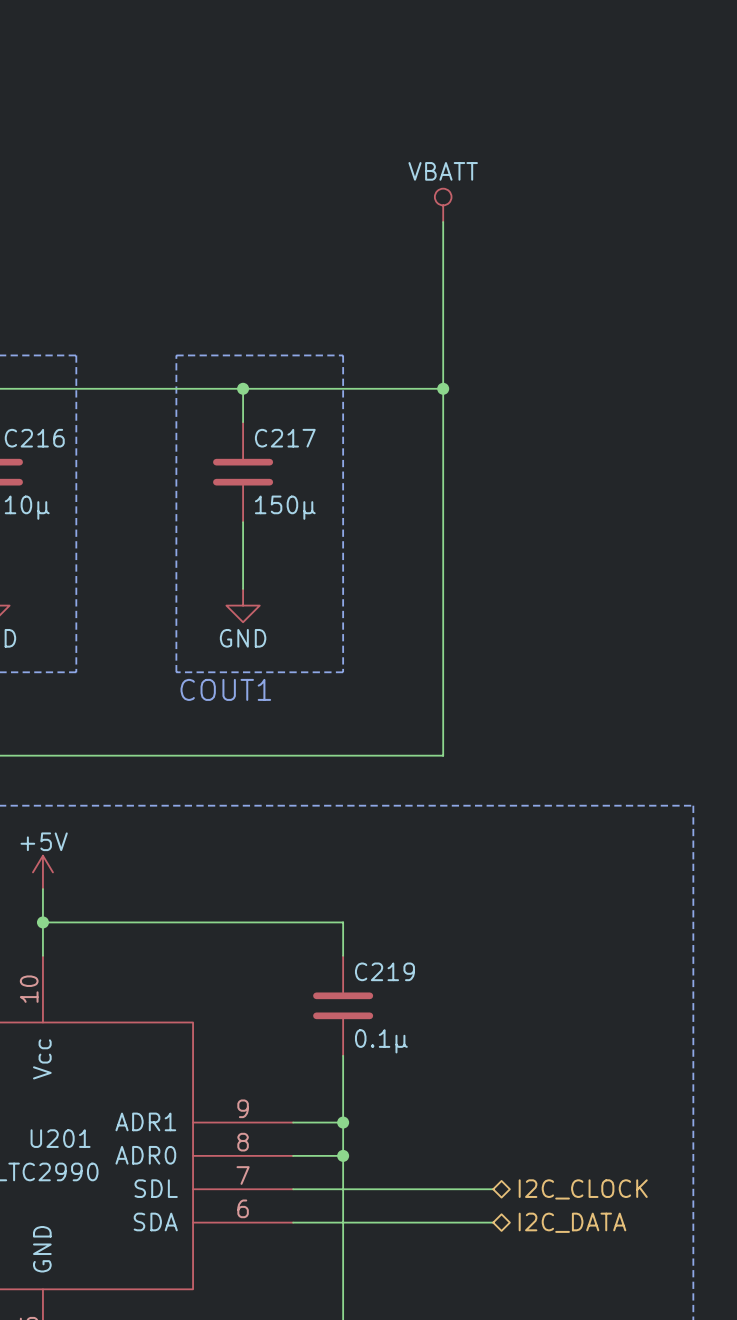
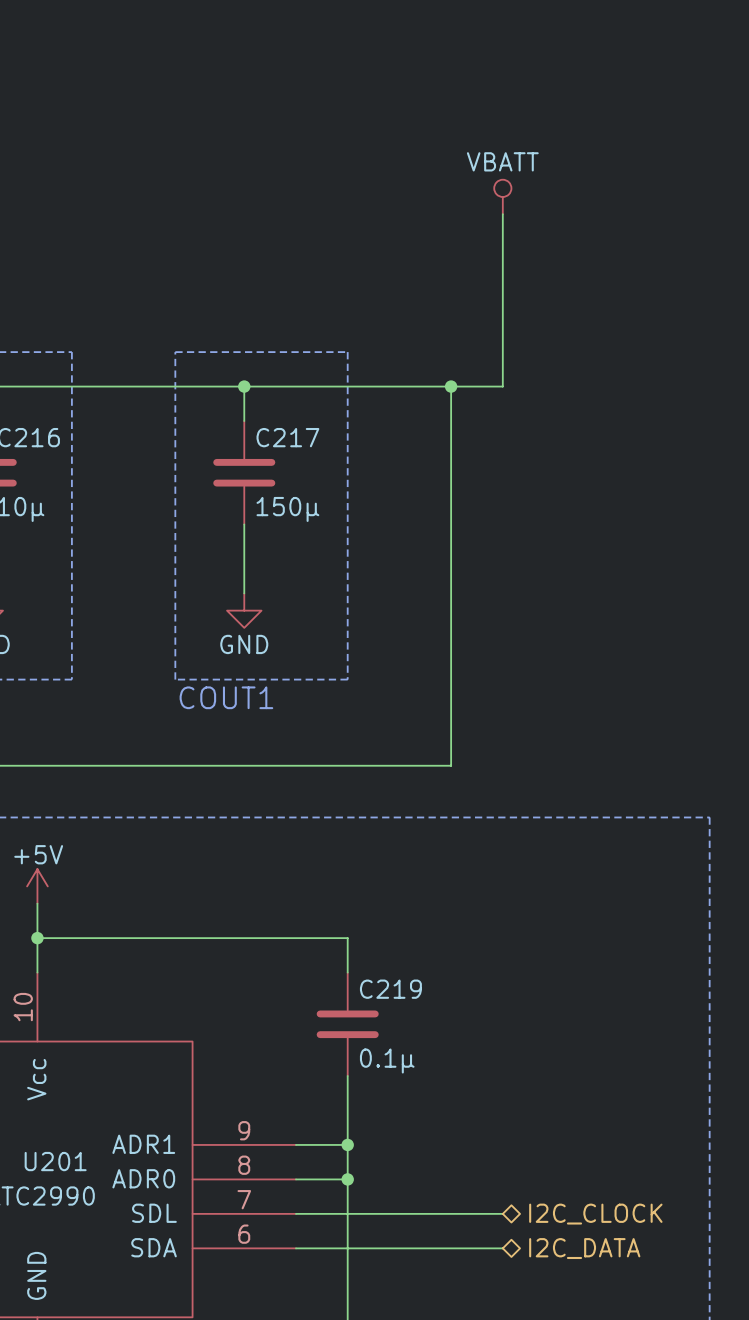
power symbol position: VBATT (443, 205) -> VBATT (502, 196)
wire: (443, 222) (443, 388) -> (502, 214) (502, 386) (451, 386)

